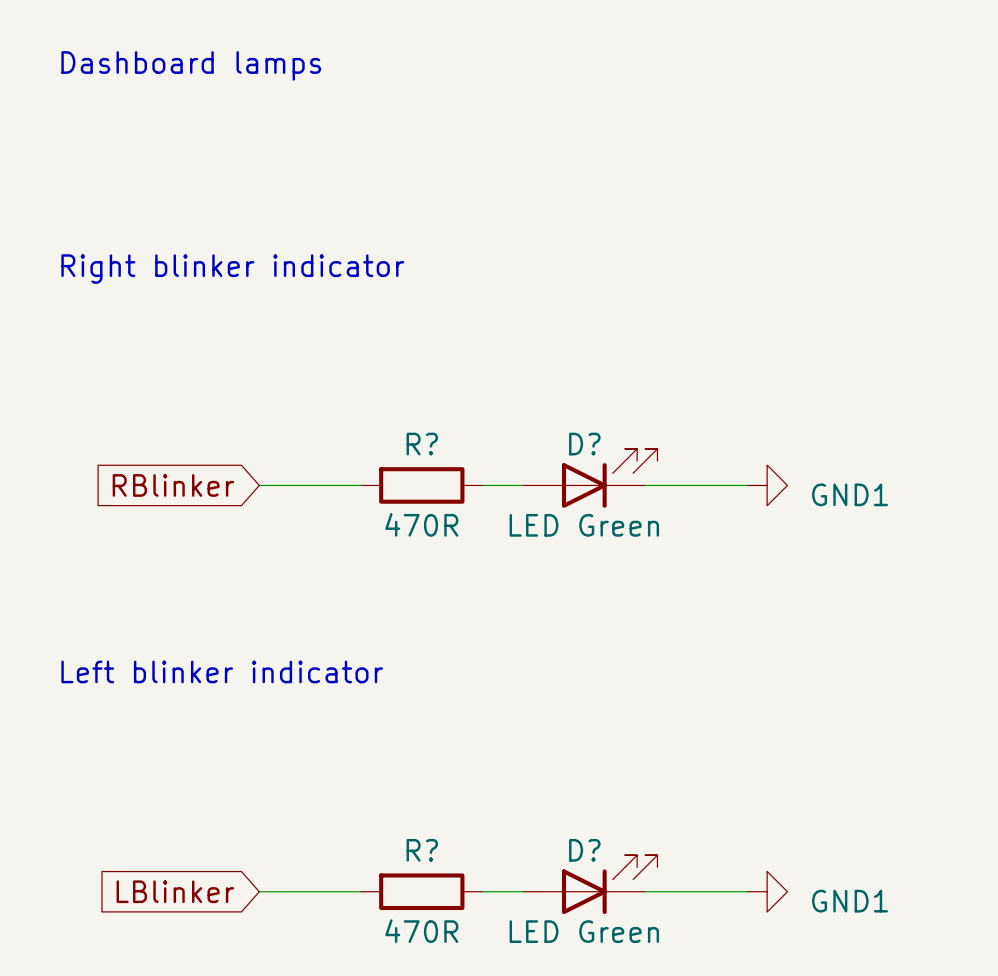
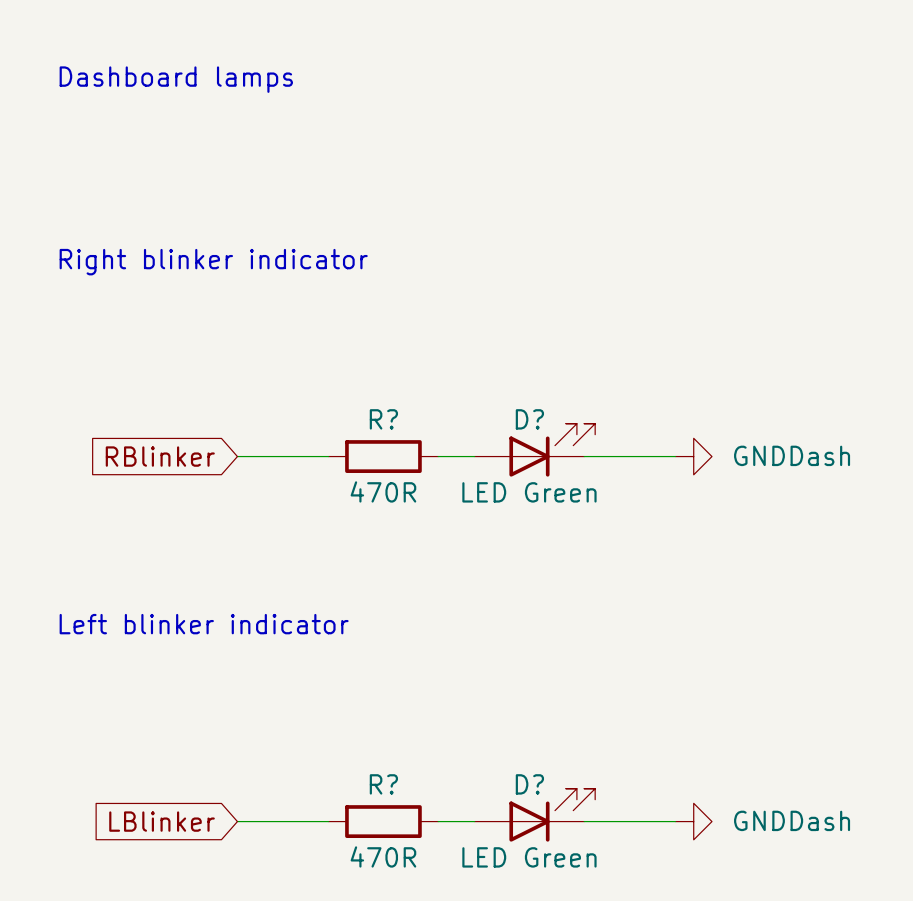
power symbol: GND1 (767, 485) -> GNDDash (693, 456)
power symbol: GND1 (767, 891) -> GNDDash (693, 821)

